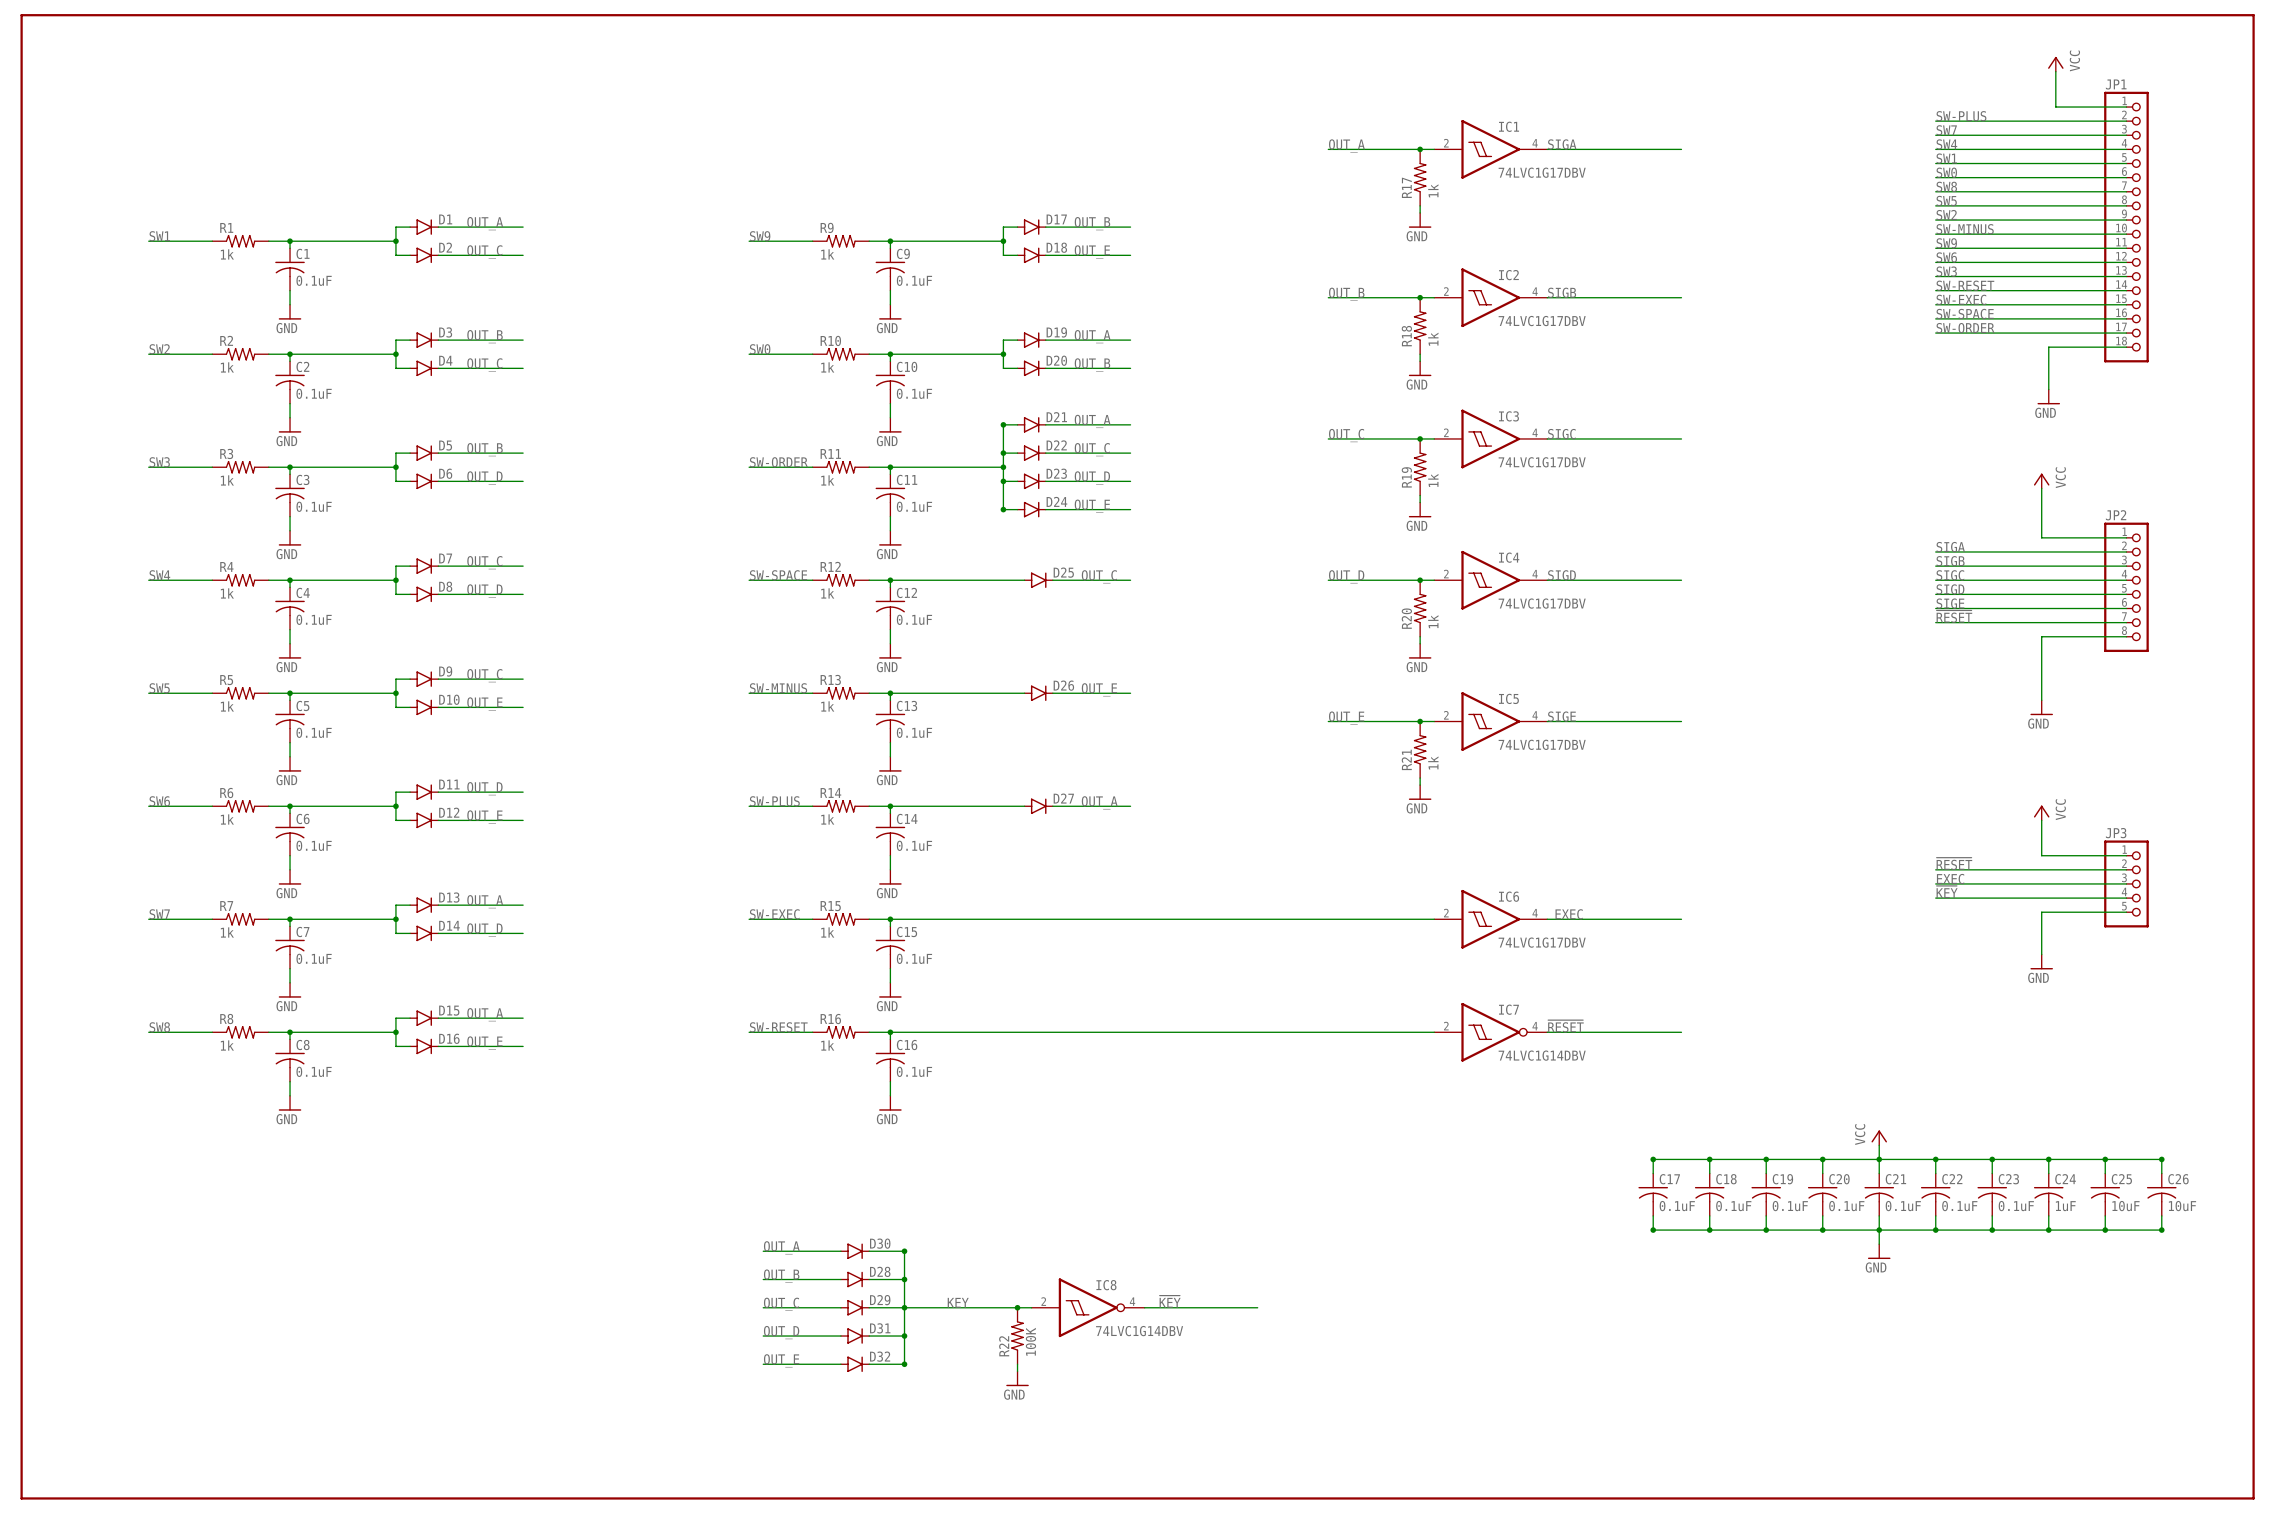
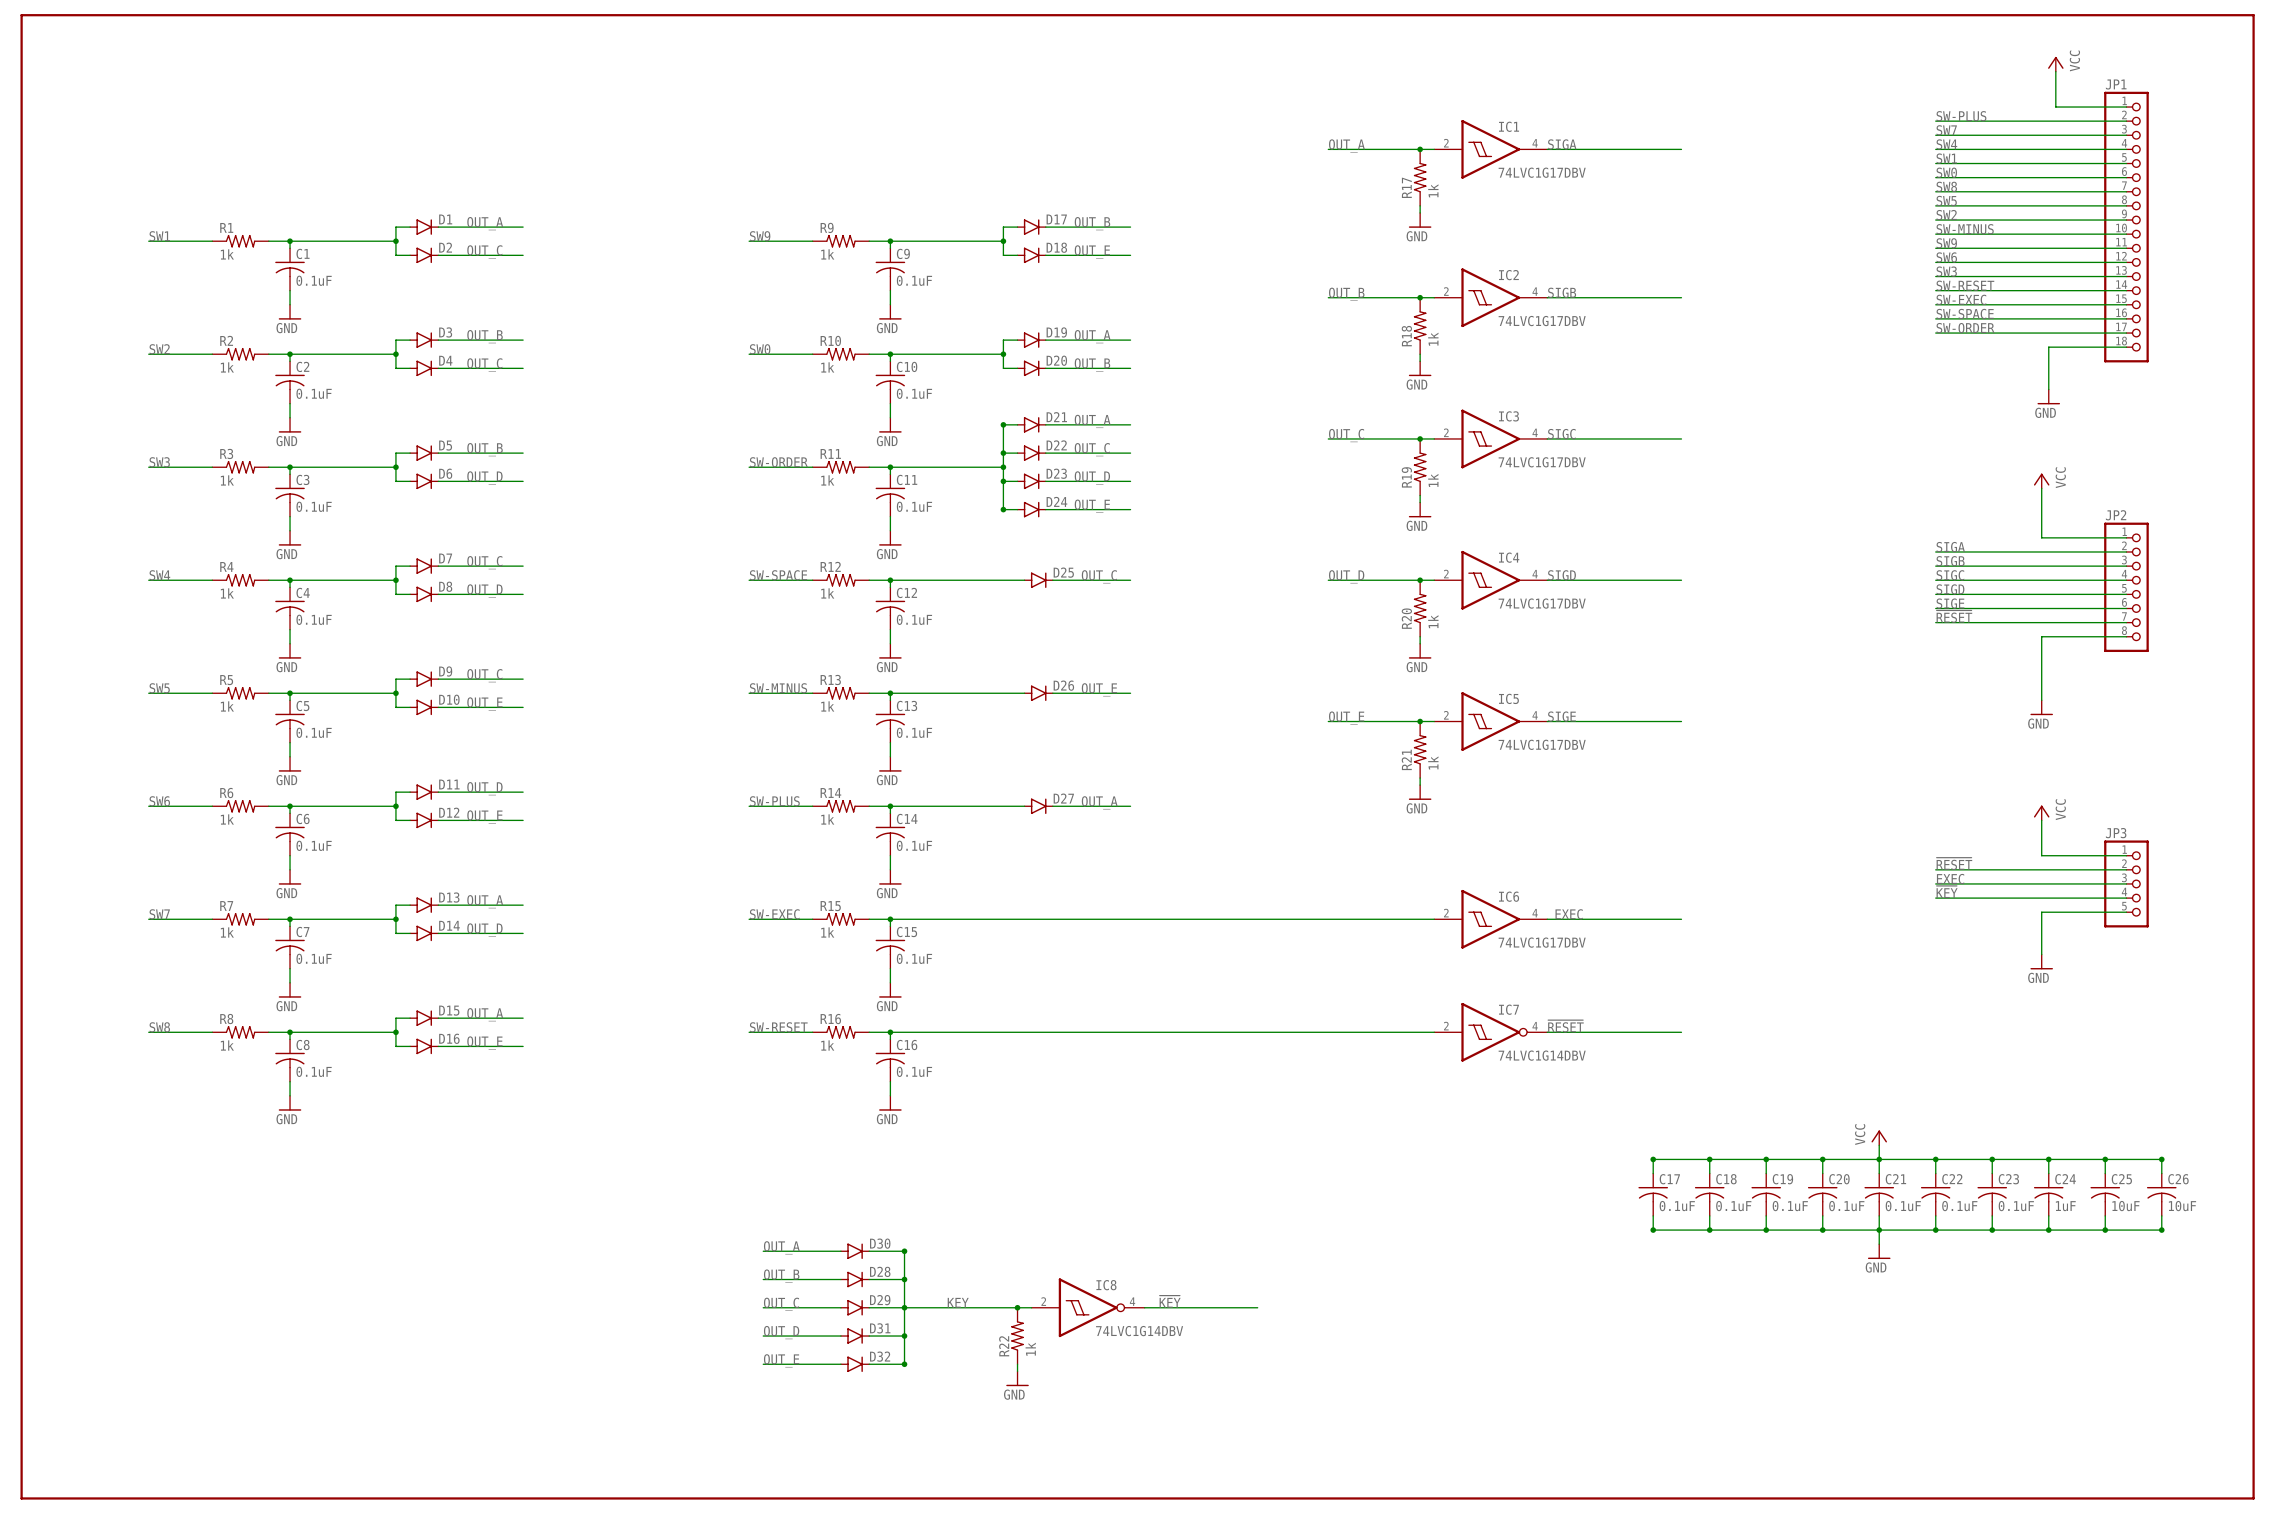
R22 value: 100K (1030, 1341) -> 1k (1030, 1349)

